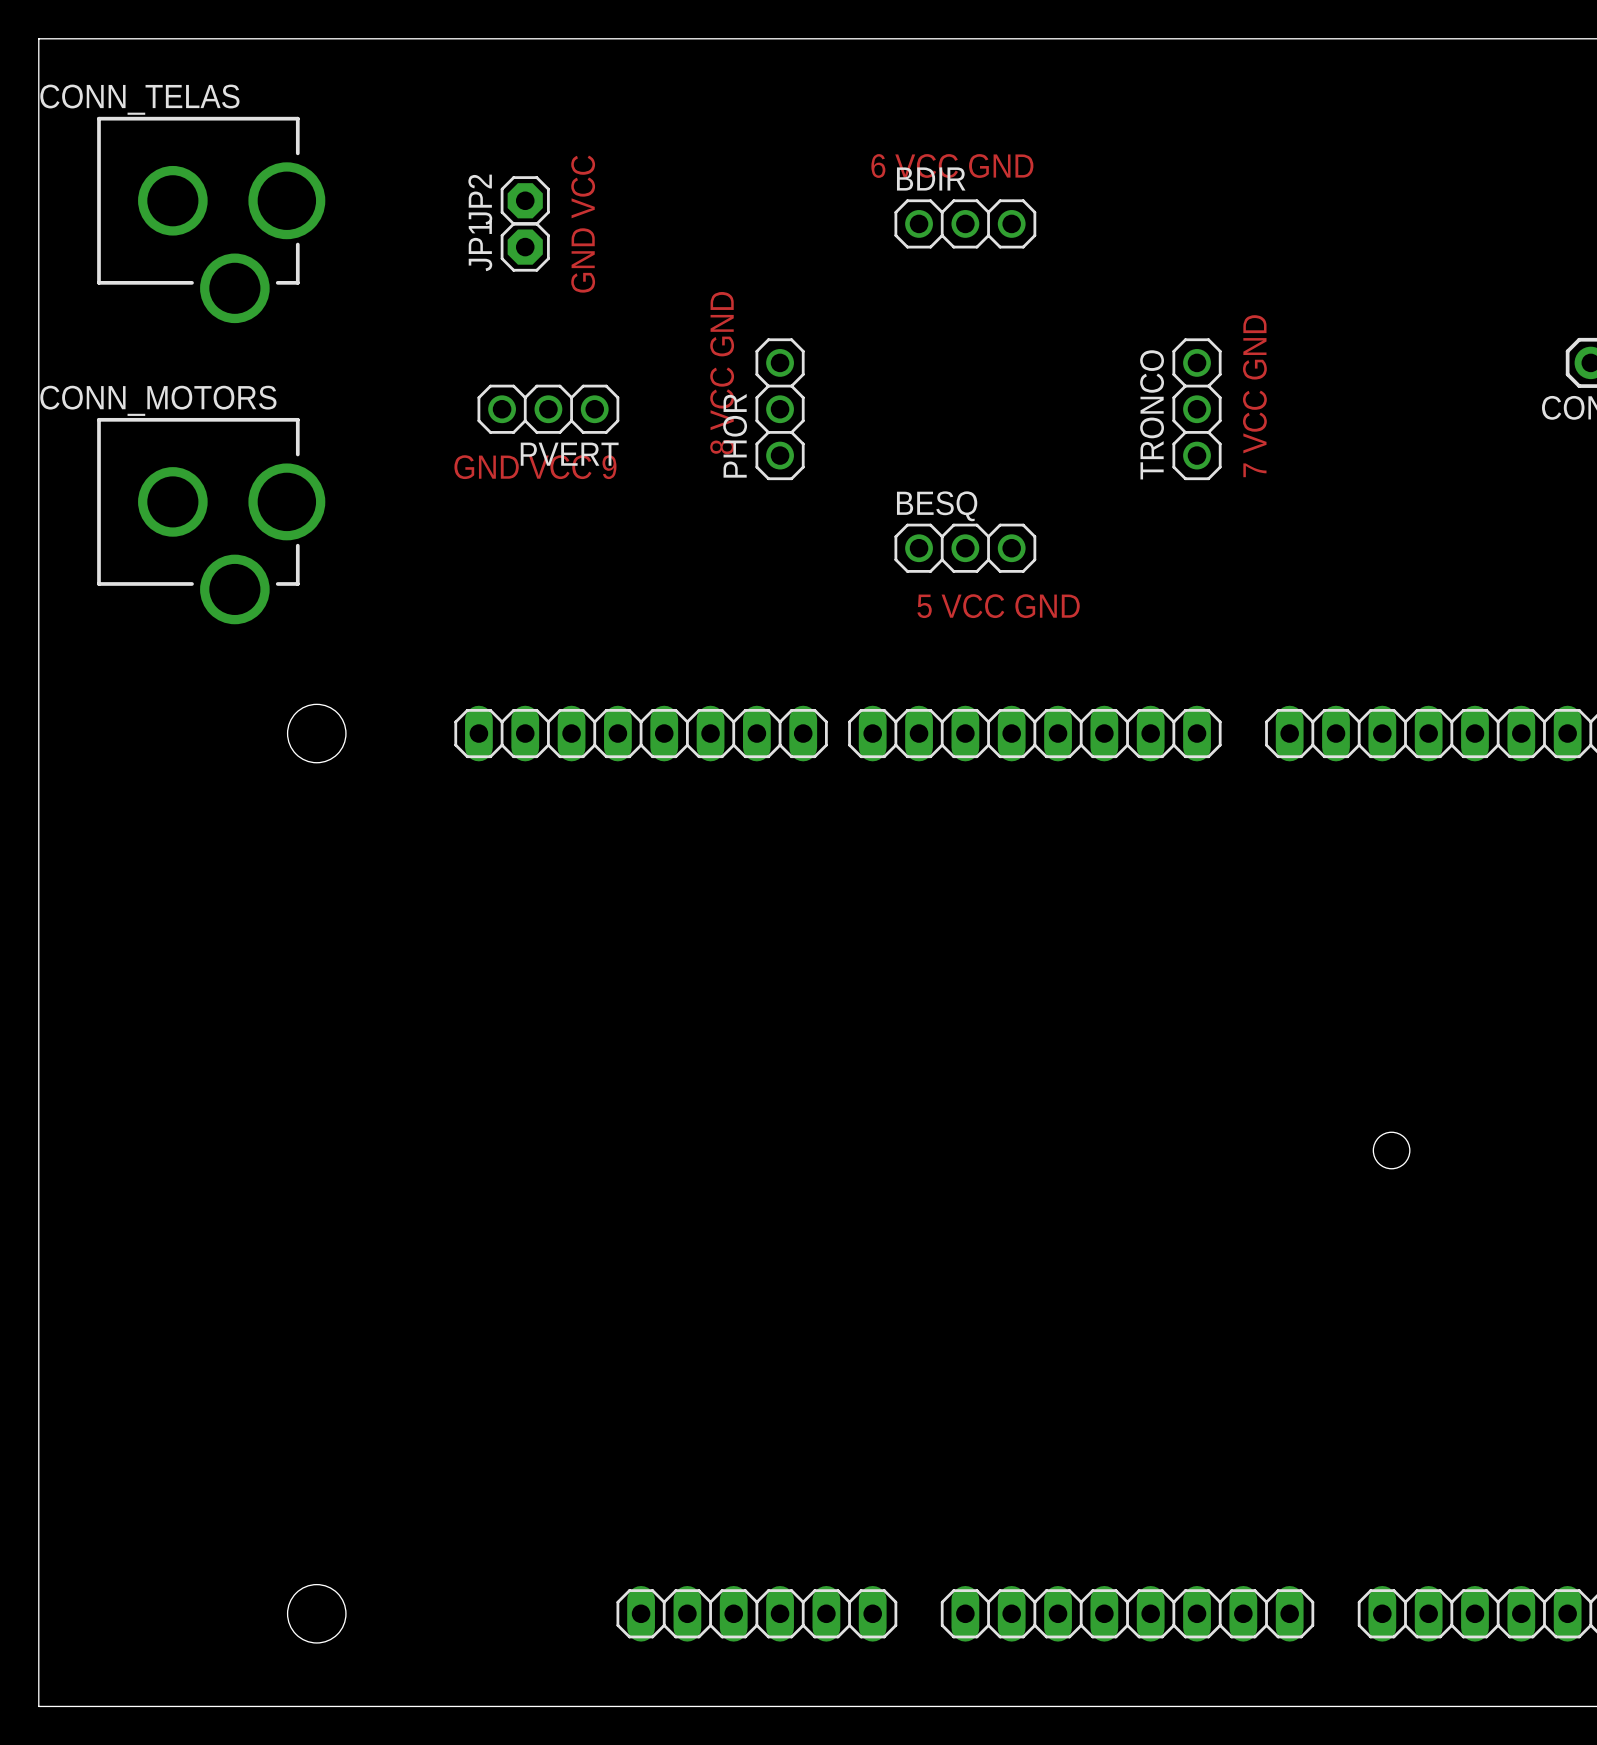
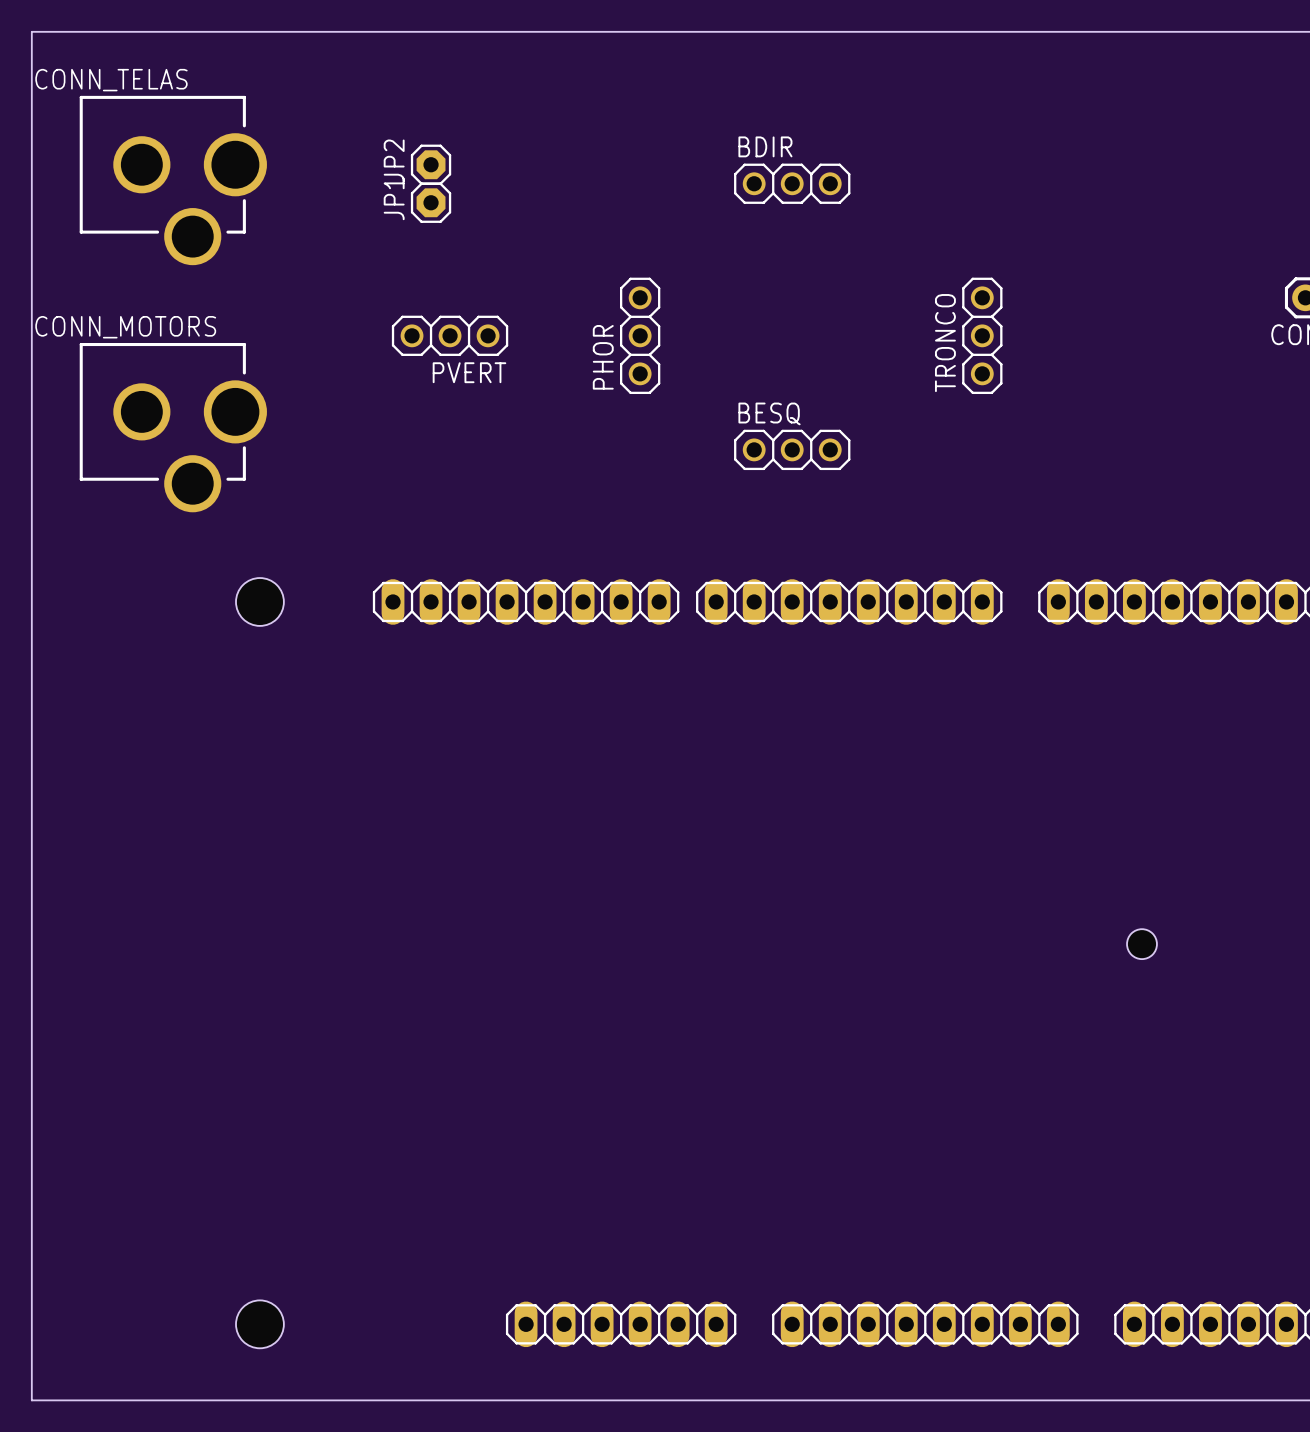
text: 6 VCC GND (952, 166) -> none
text: GND VCC (583, 224) -> none
text: 8 VCC GND (722, 373) -> none
text: 7 VCC GND (1254, 396) -> none
text: GND VCC 9 (535, 467) -> none
text: 5 VCC GND (998, 606) -> none

